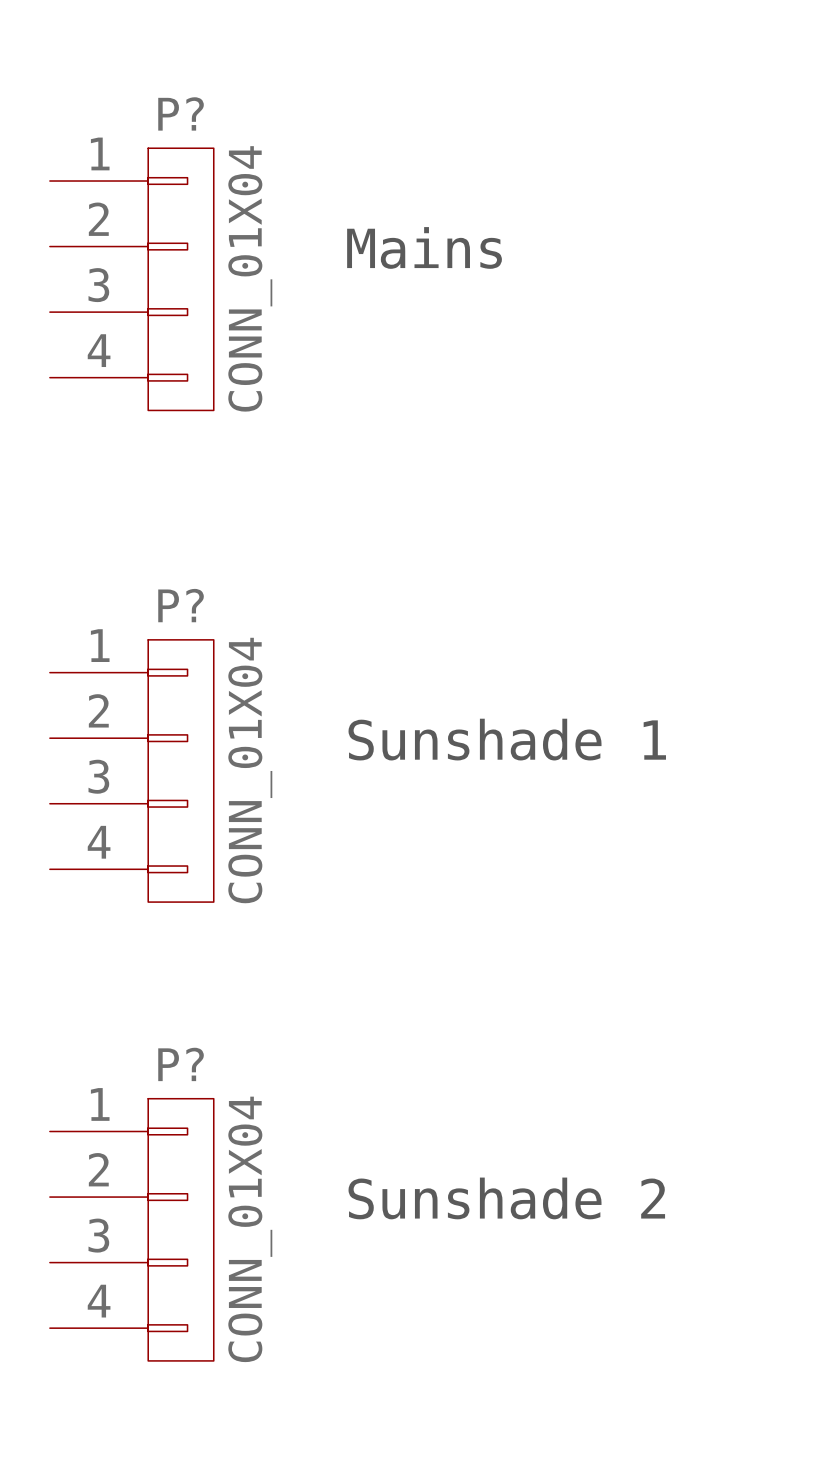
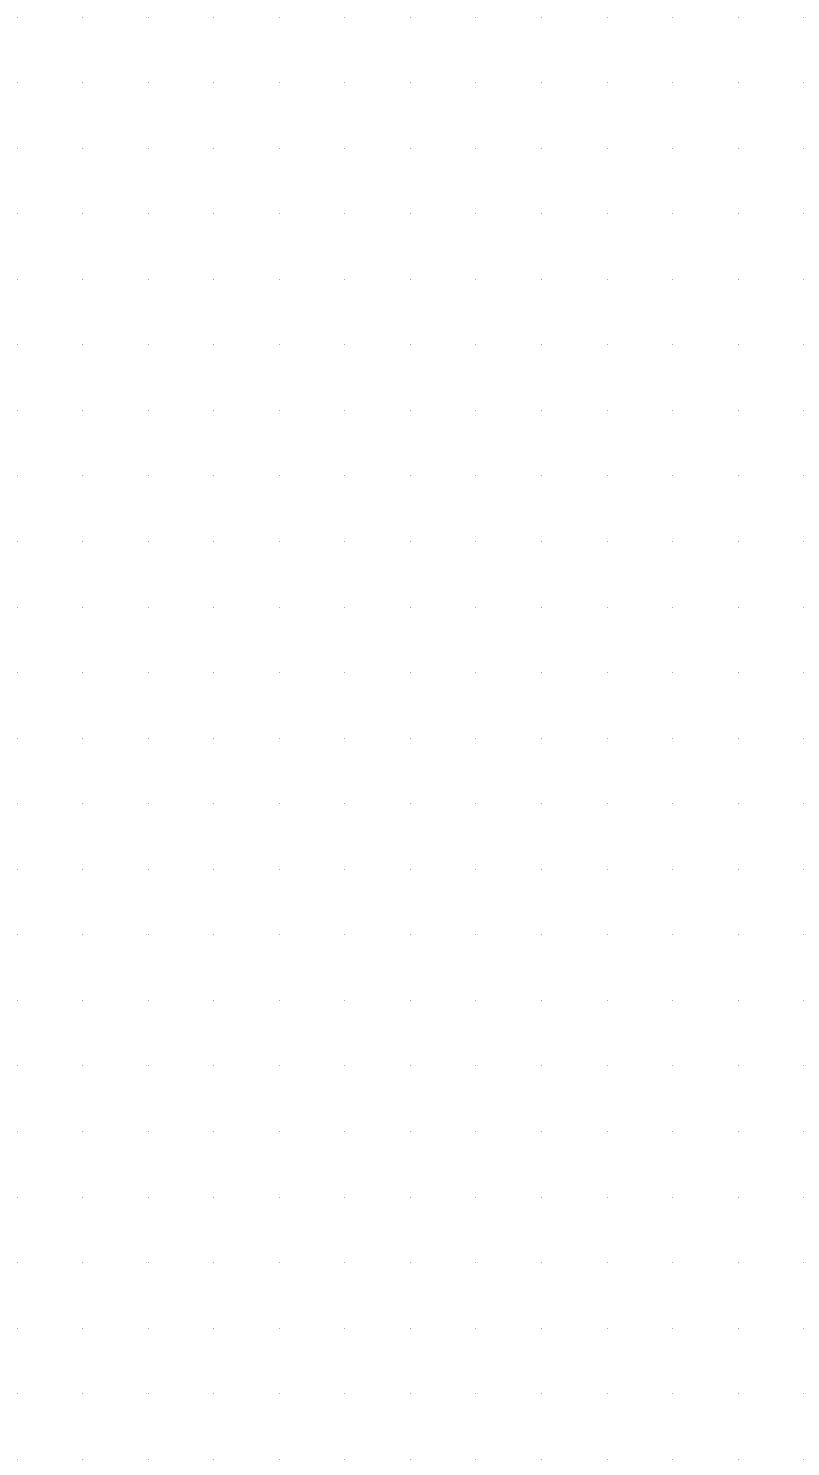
text: Mains (424, 247) -> none
P?: CONN_01X04 (131, 279) -> none
text: Sunshade 1 (507, 739) -> none
P?: CONN_01X04 (131, 770) -> none
text: Sunshade 2 (506, 1198) -> none
P?: CONN_01X04 (131, 1229) -> none

